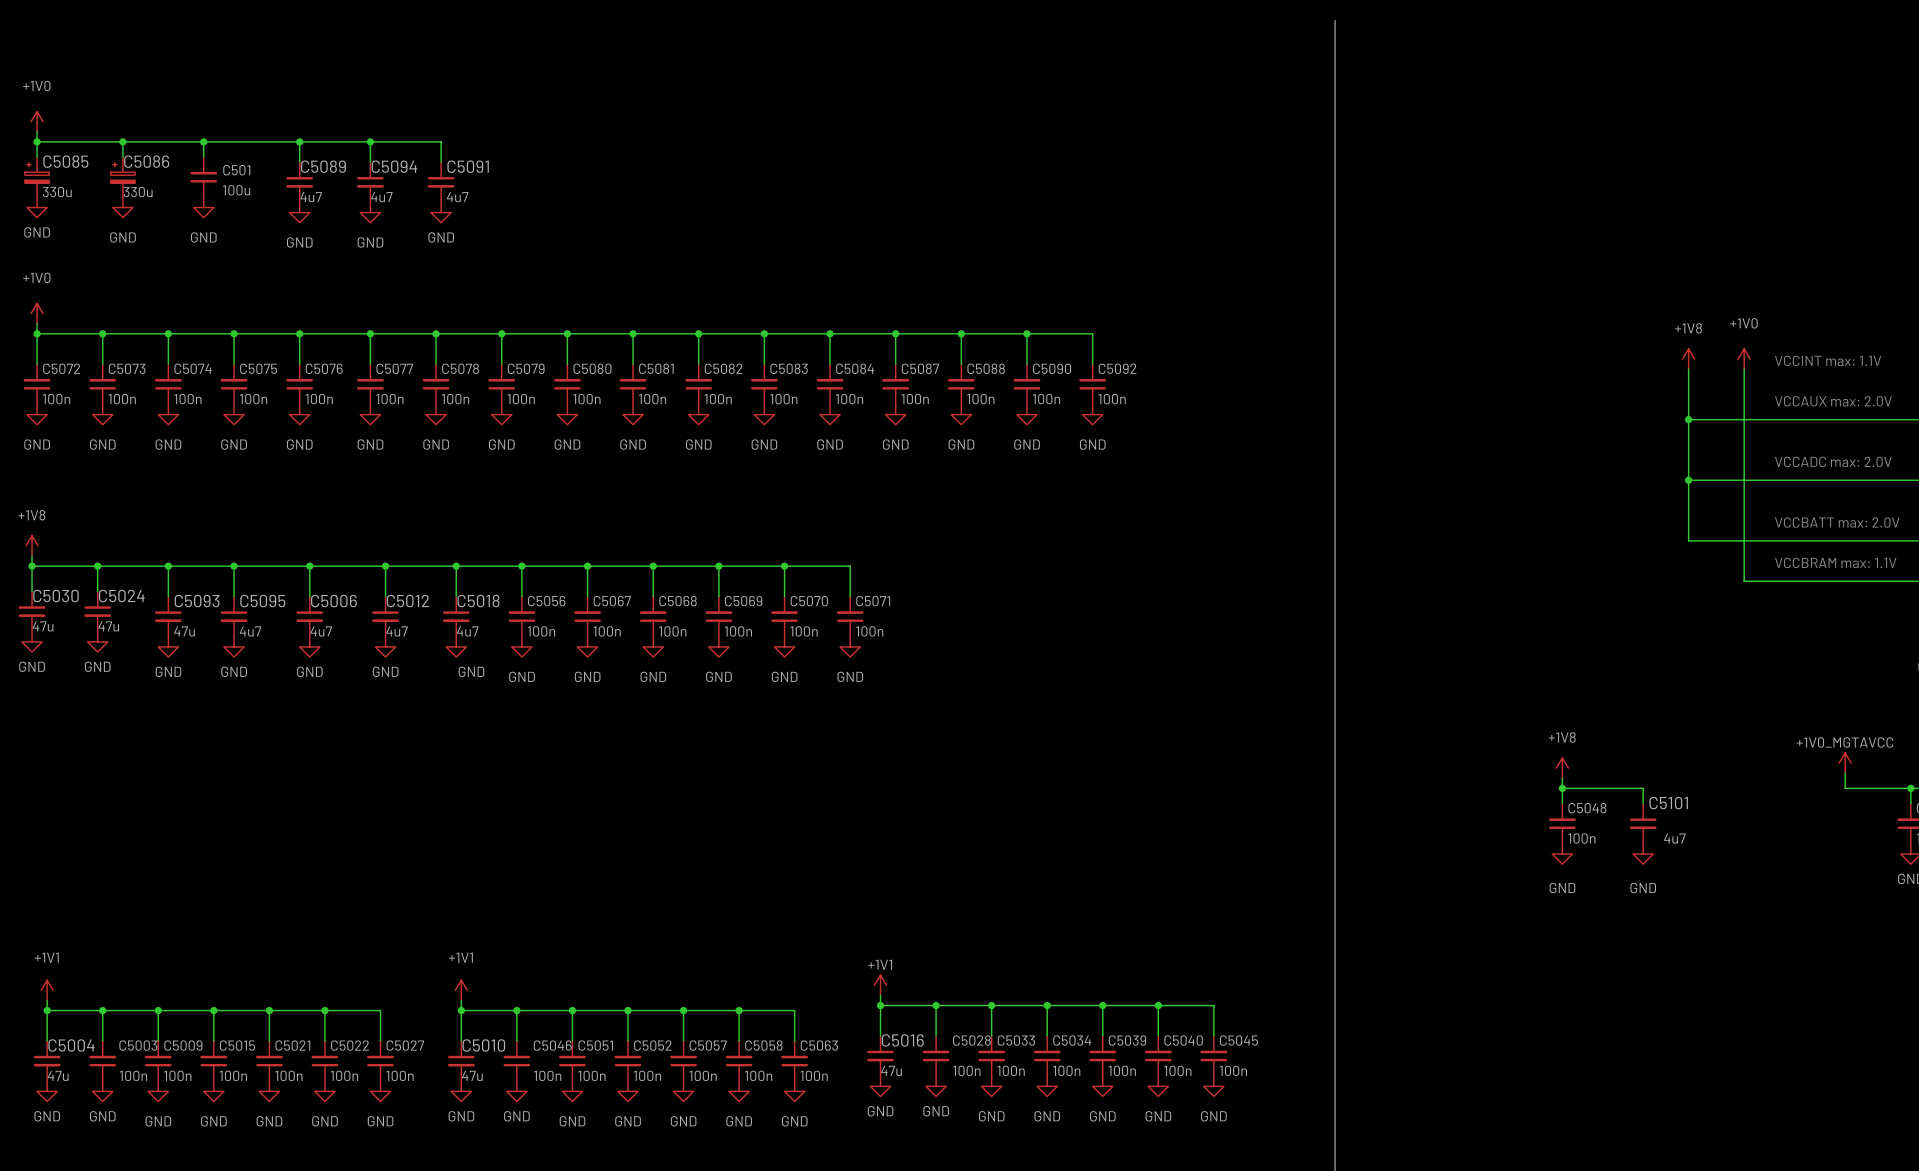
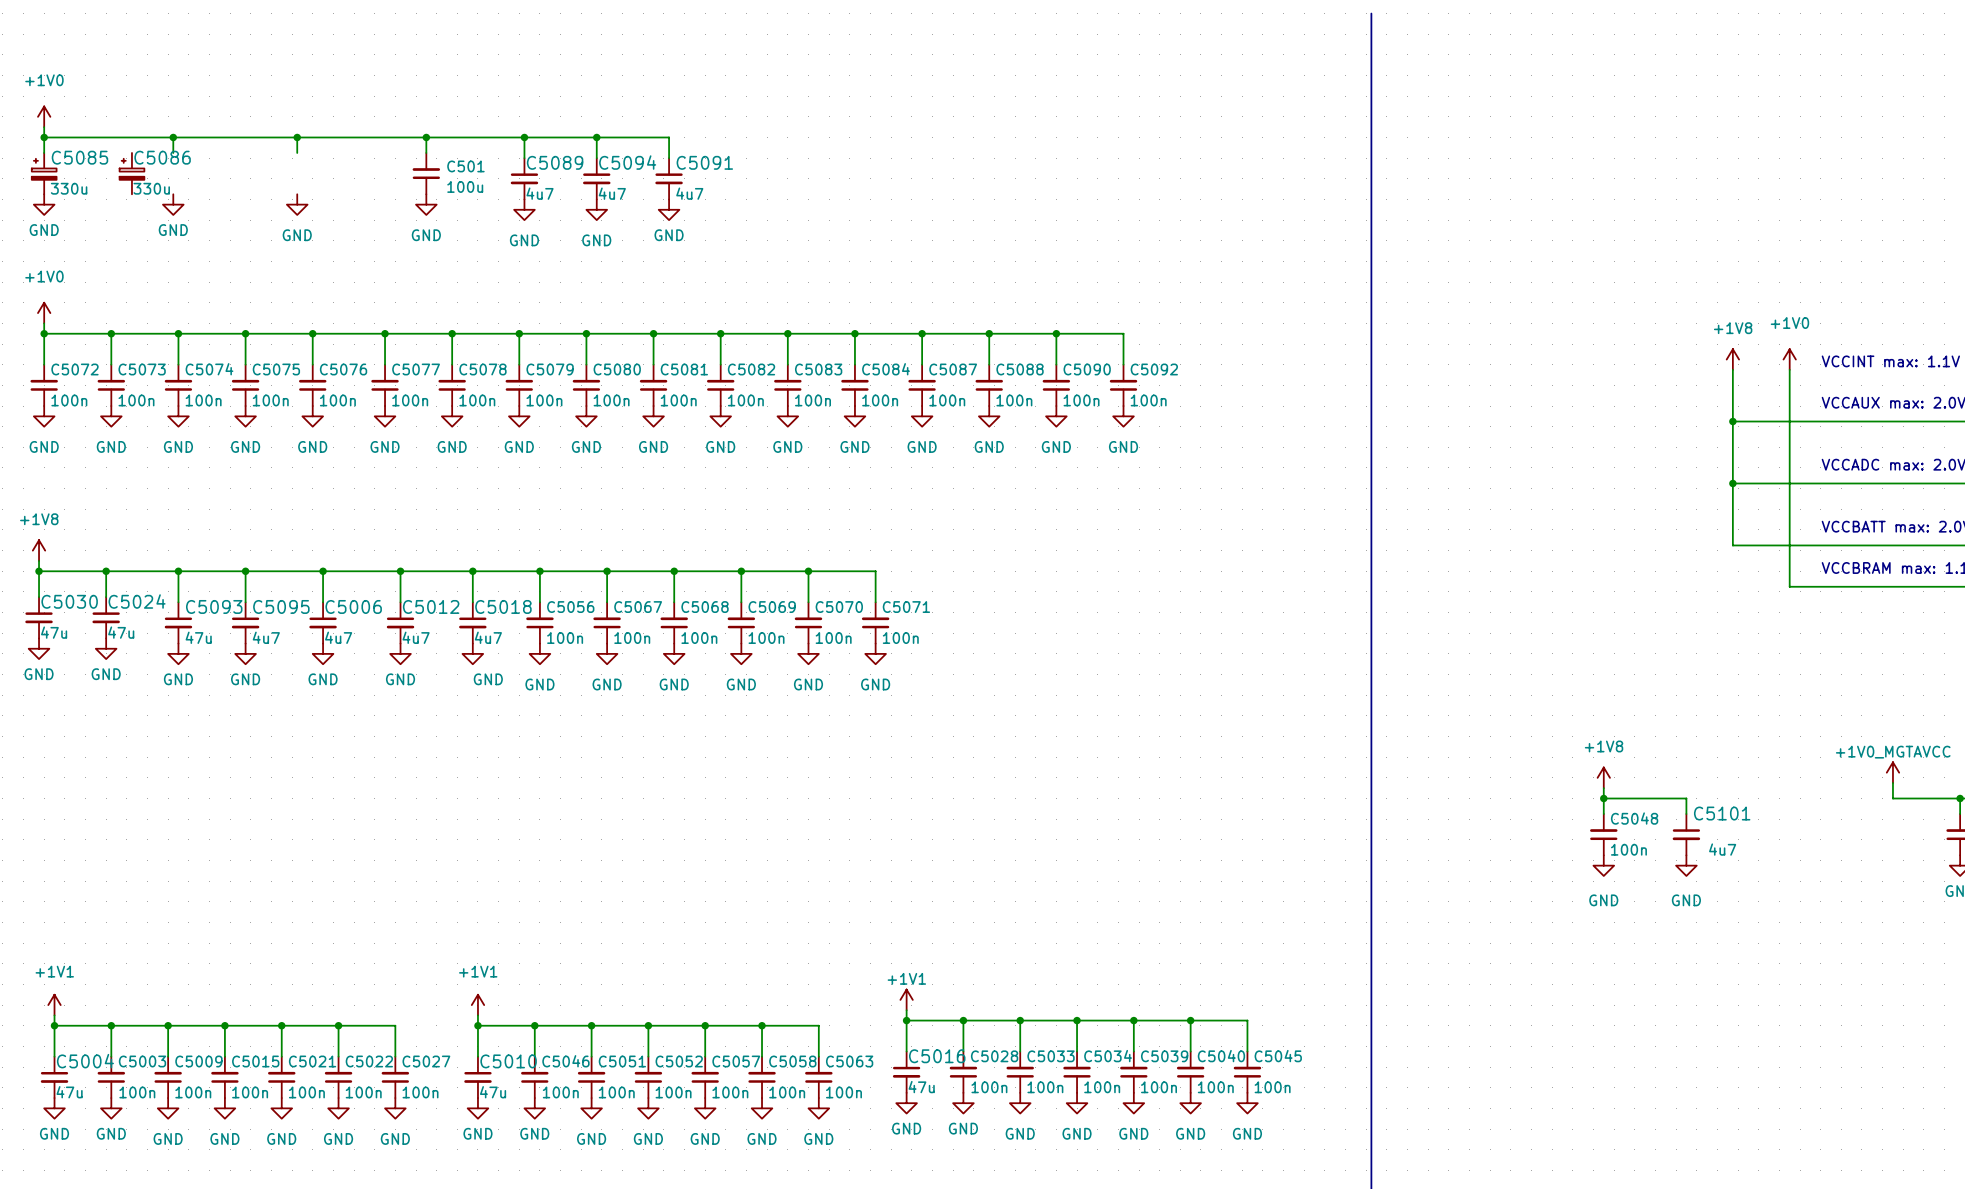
wire: (122, 141) (122, 157) -> (173, 137) (173, 152)
junction: (122, 141) -> none
junction: none -> (173, 137)
wire: (203, 141) (203, 157) -> (297, 137) (297, 152)
junction: (203, 141) -> none
wire: (299, 141) (299, 162) -> none
junction position: (299, 141) -> (297, 137)
wire: (370, 141) (370, 162) -> (524, 137) (524, 158)
junction position: (370, 141) -> (426, 137)
wire: none -> (426, 137) (426, 152)
wire: (441, 141) (441, 162) -> (457, 137) (669, 137) (669, 158)
junction: none -> (524, 137)
wire: none -> (596, 137) (596, 158)
junction: none -> (596, 137)
C501 position: (203, 177) -> (426, 173)
C5089 position: (299, 182) -> (524, 178)
C5094 position: (370, 182) -> (596, 178)
C5091 position: (441, 182) -> (669, 178)
power symbol: GND (122, 207) -> none
power symbol: none -> GND (173, 204)
power symbol: GND (203, 207) -> none
power symbol: none -> GND (426, 204)
power symbol position: GND (299, 212) -> GND (297, 204)
power symbol: GND (370, 212) -> none
power symbol: GND (441, 212) -> none
power symbol: none -> GND (524, 209)
power symbol: none -> GND (596, 209)
power symbol: none -> GND (669, 209)

